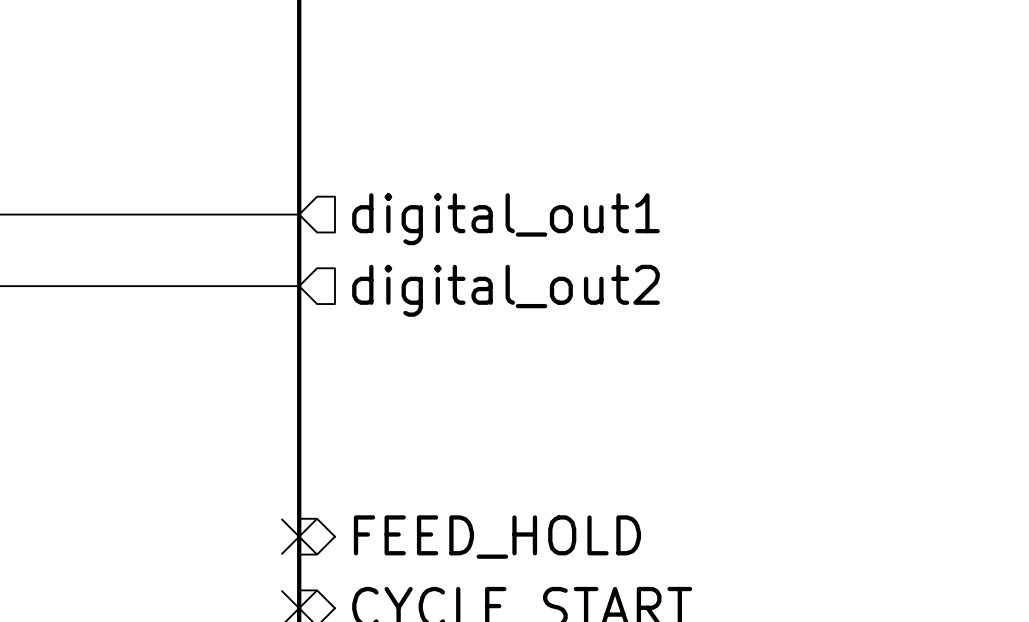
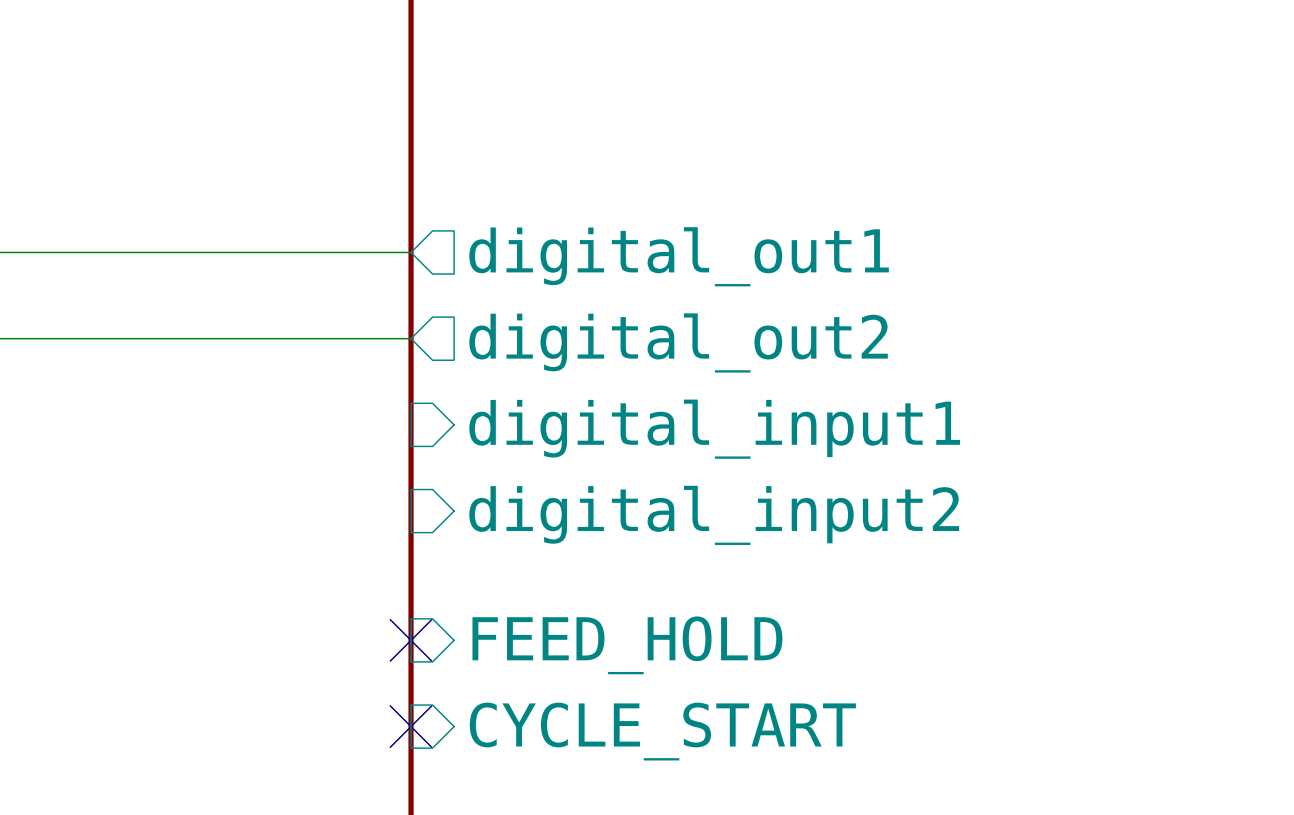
sheet pin: none -> digital_input1 (714, 429)
sheet pin: none -> digital_input2 (714, 515)

